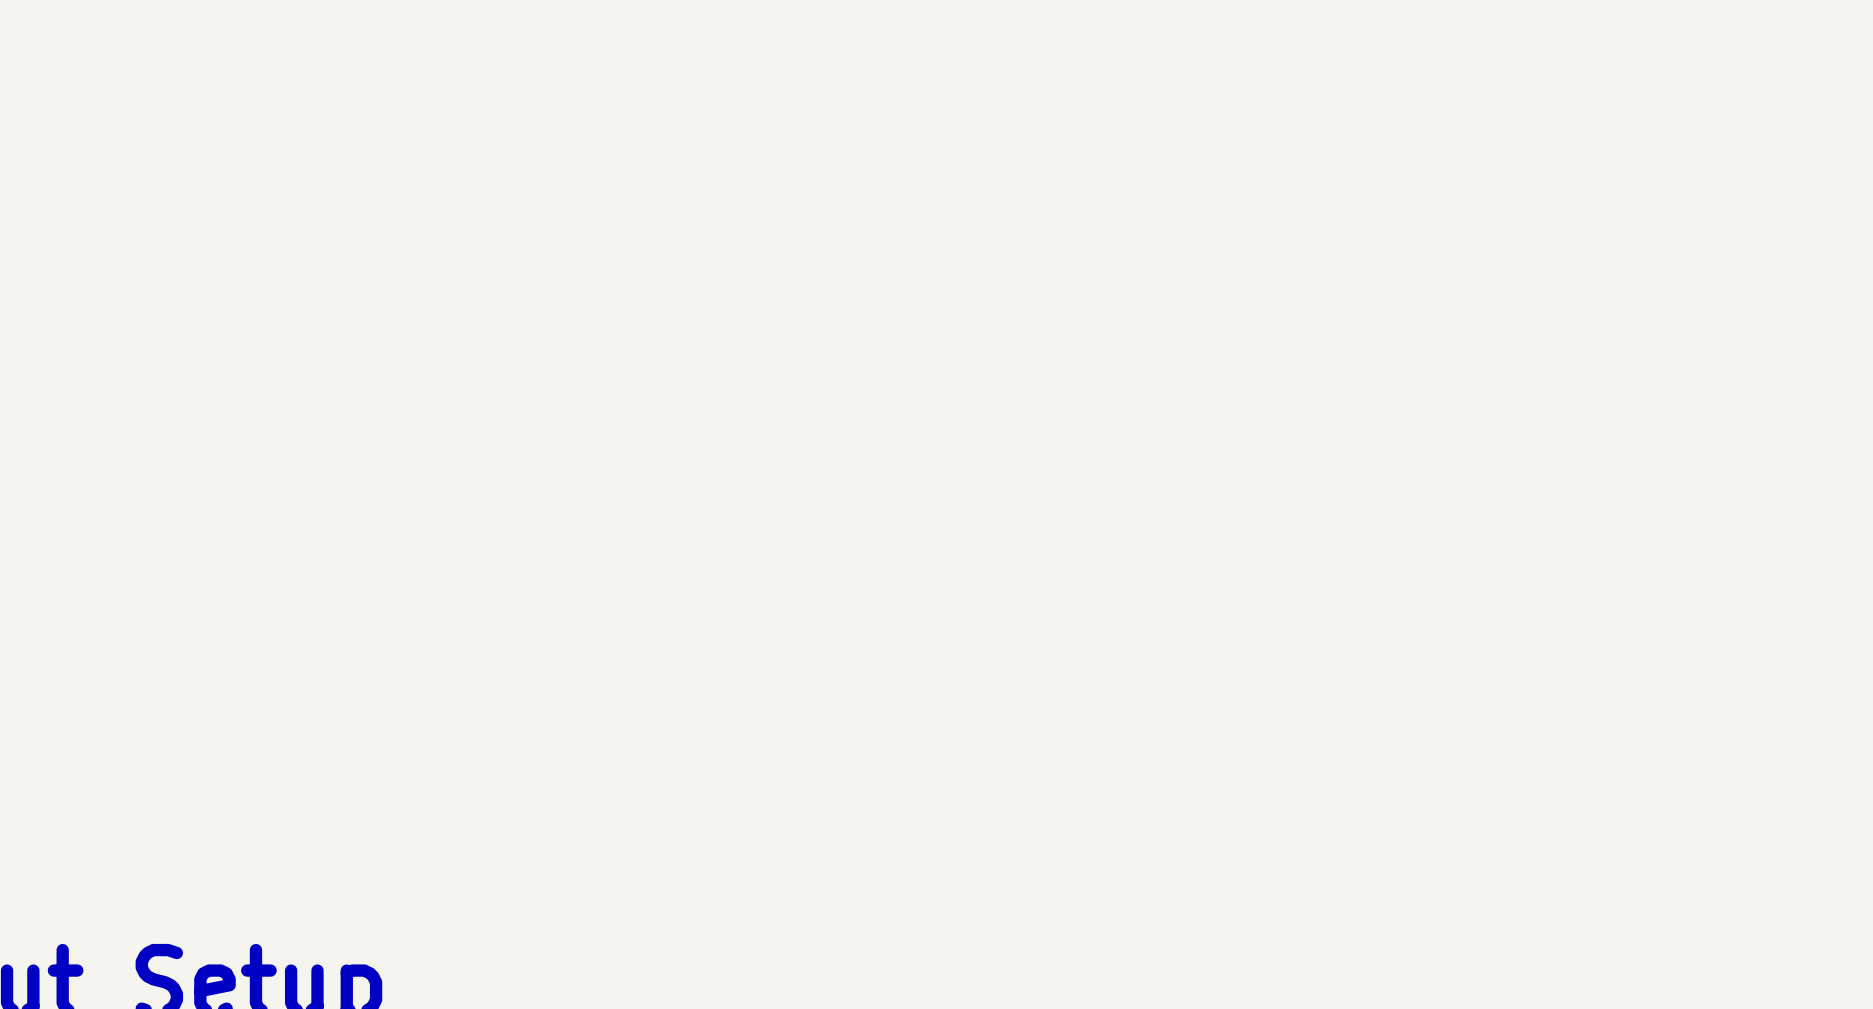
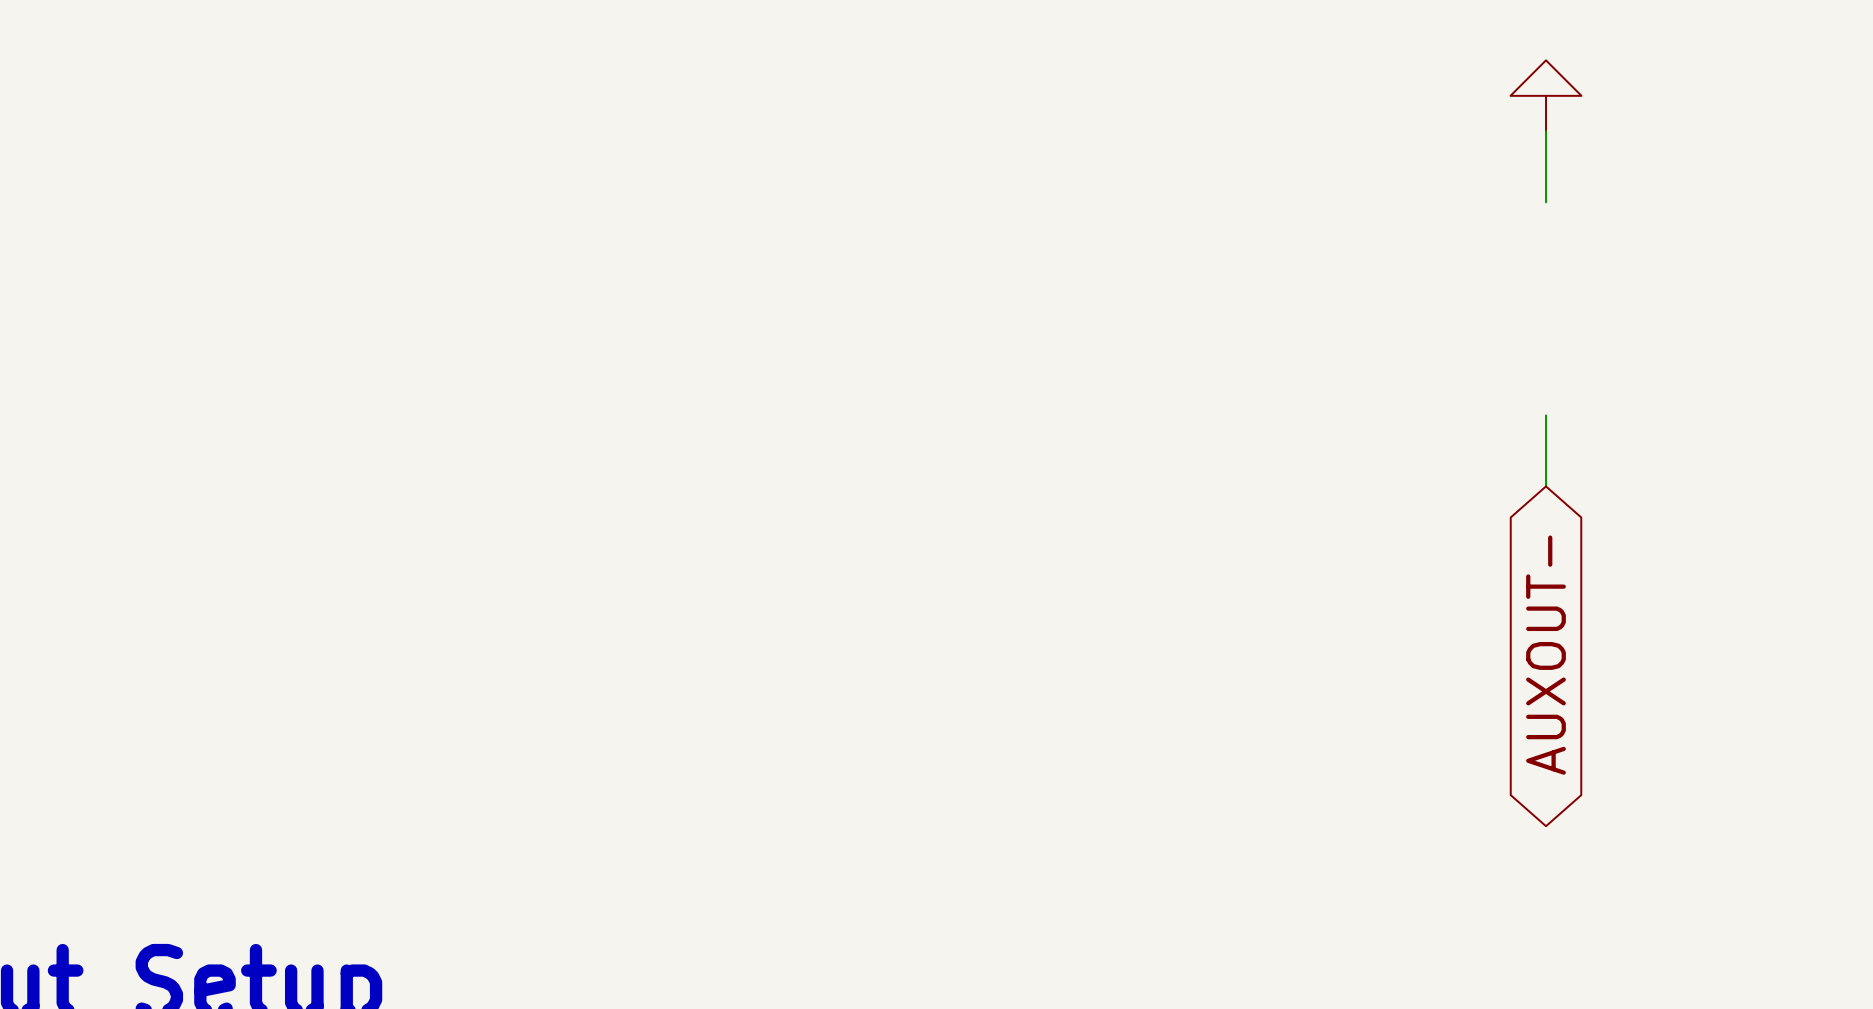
power symbol: none -> (1546, 95)
wire: none -> (1546, 131) (1546, 202)
wire: none -> (1546, 415) (1546, 486)
global label: none -> AUXOUT- (1546, 655)

